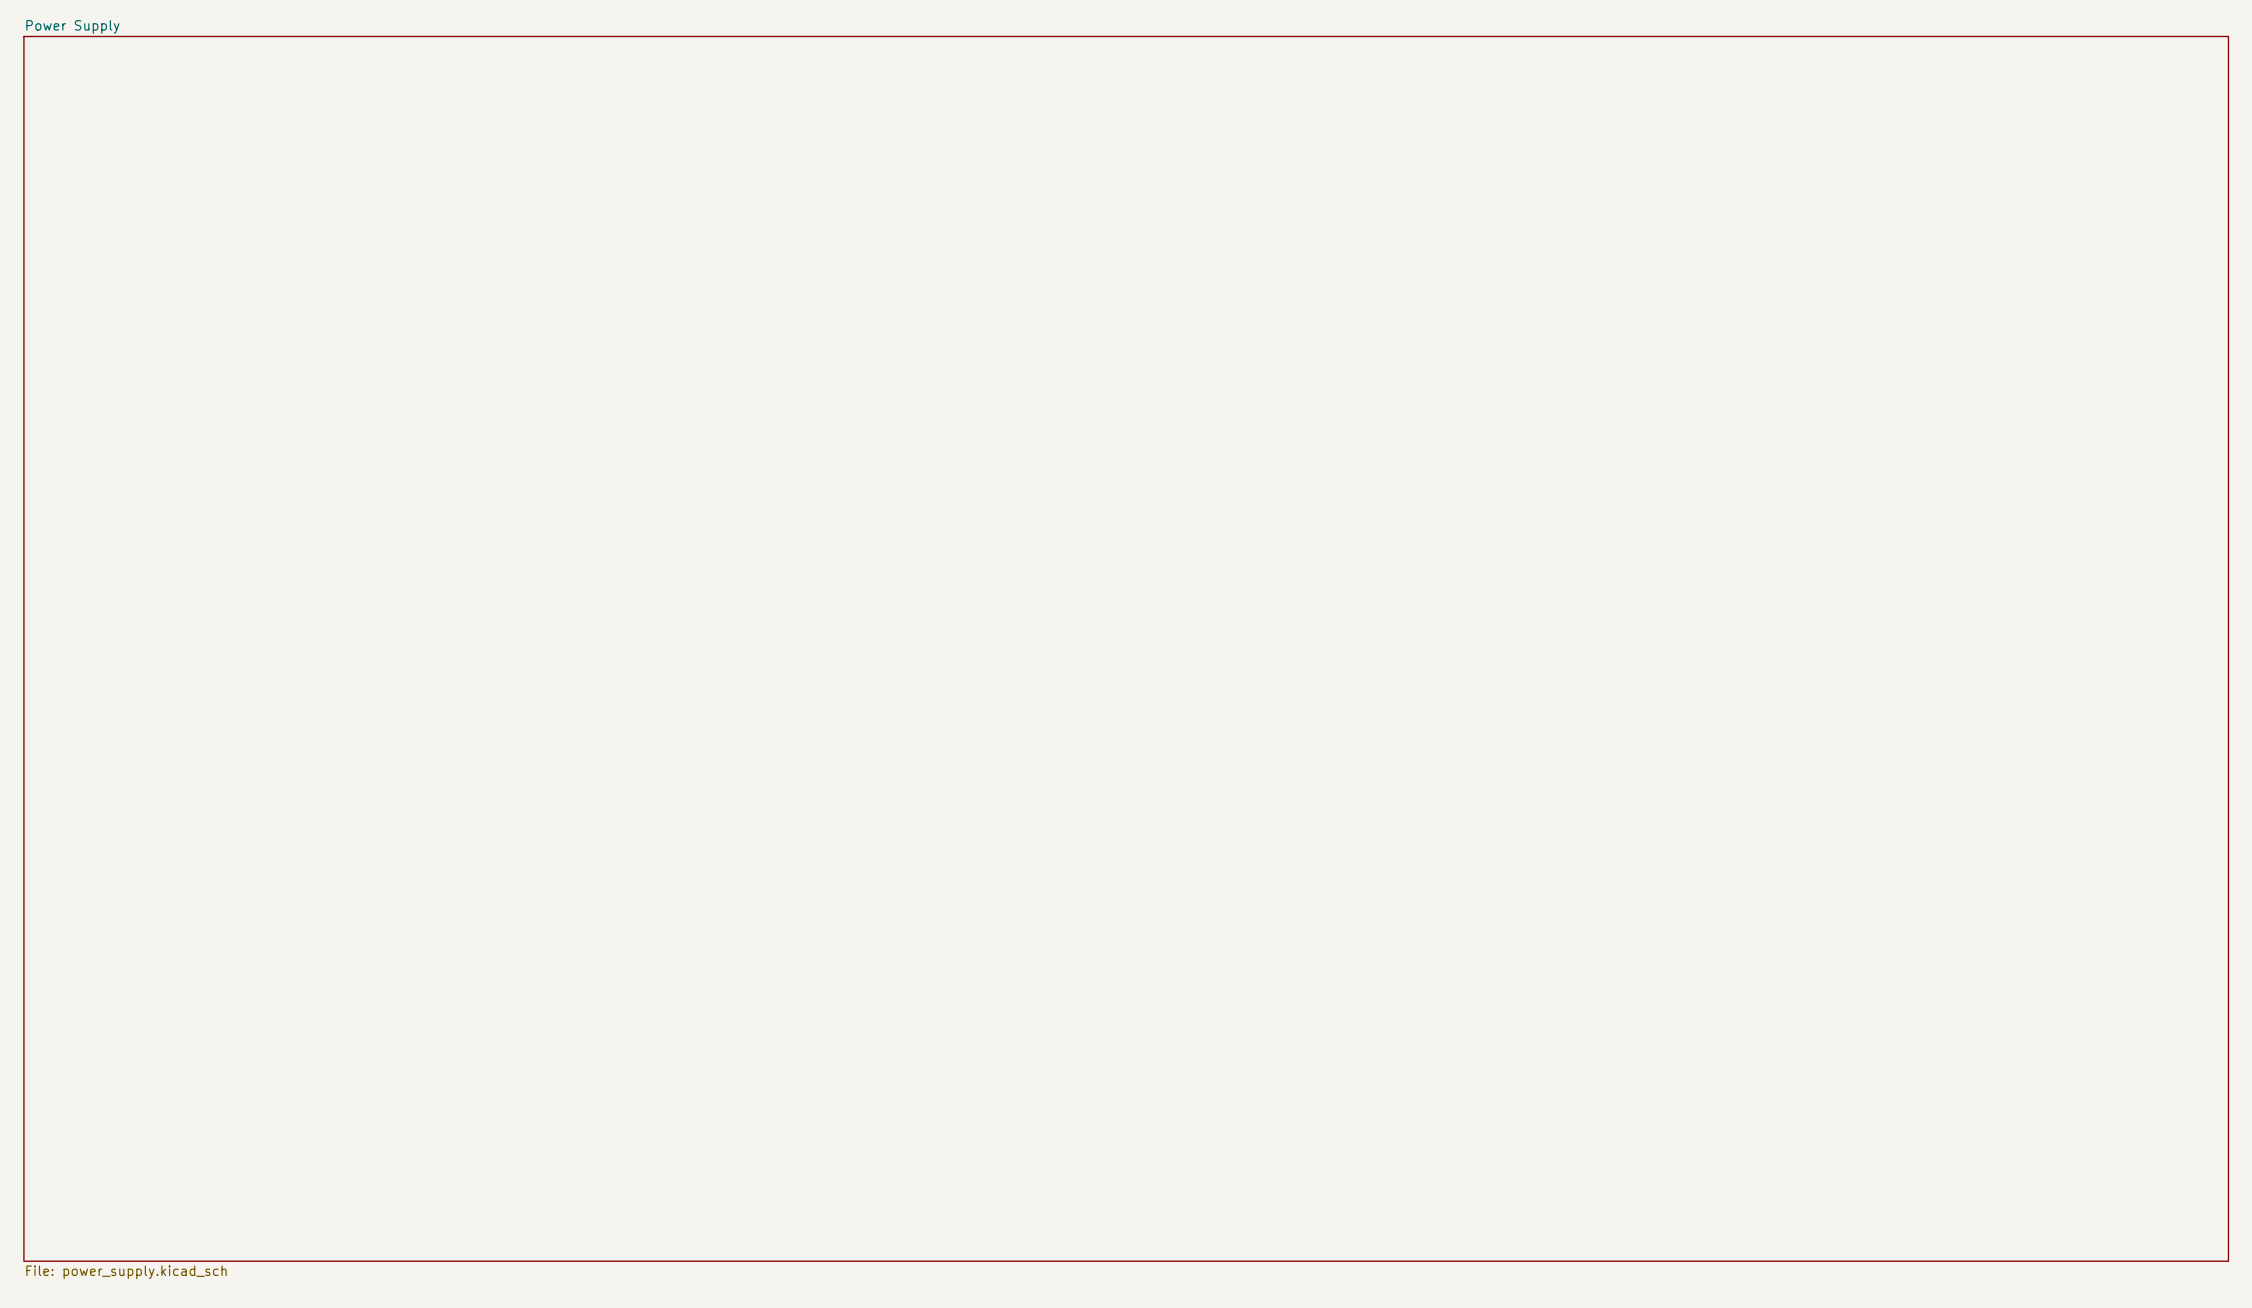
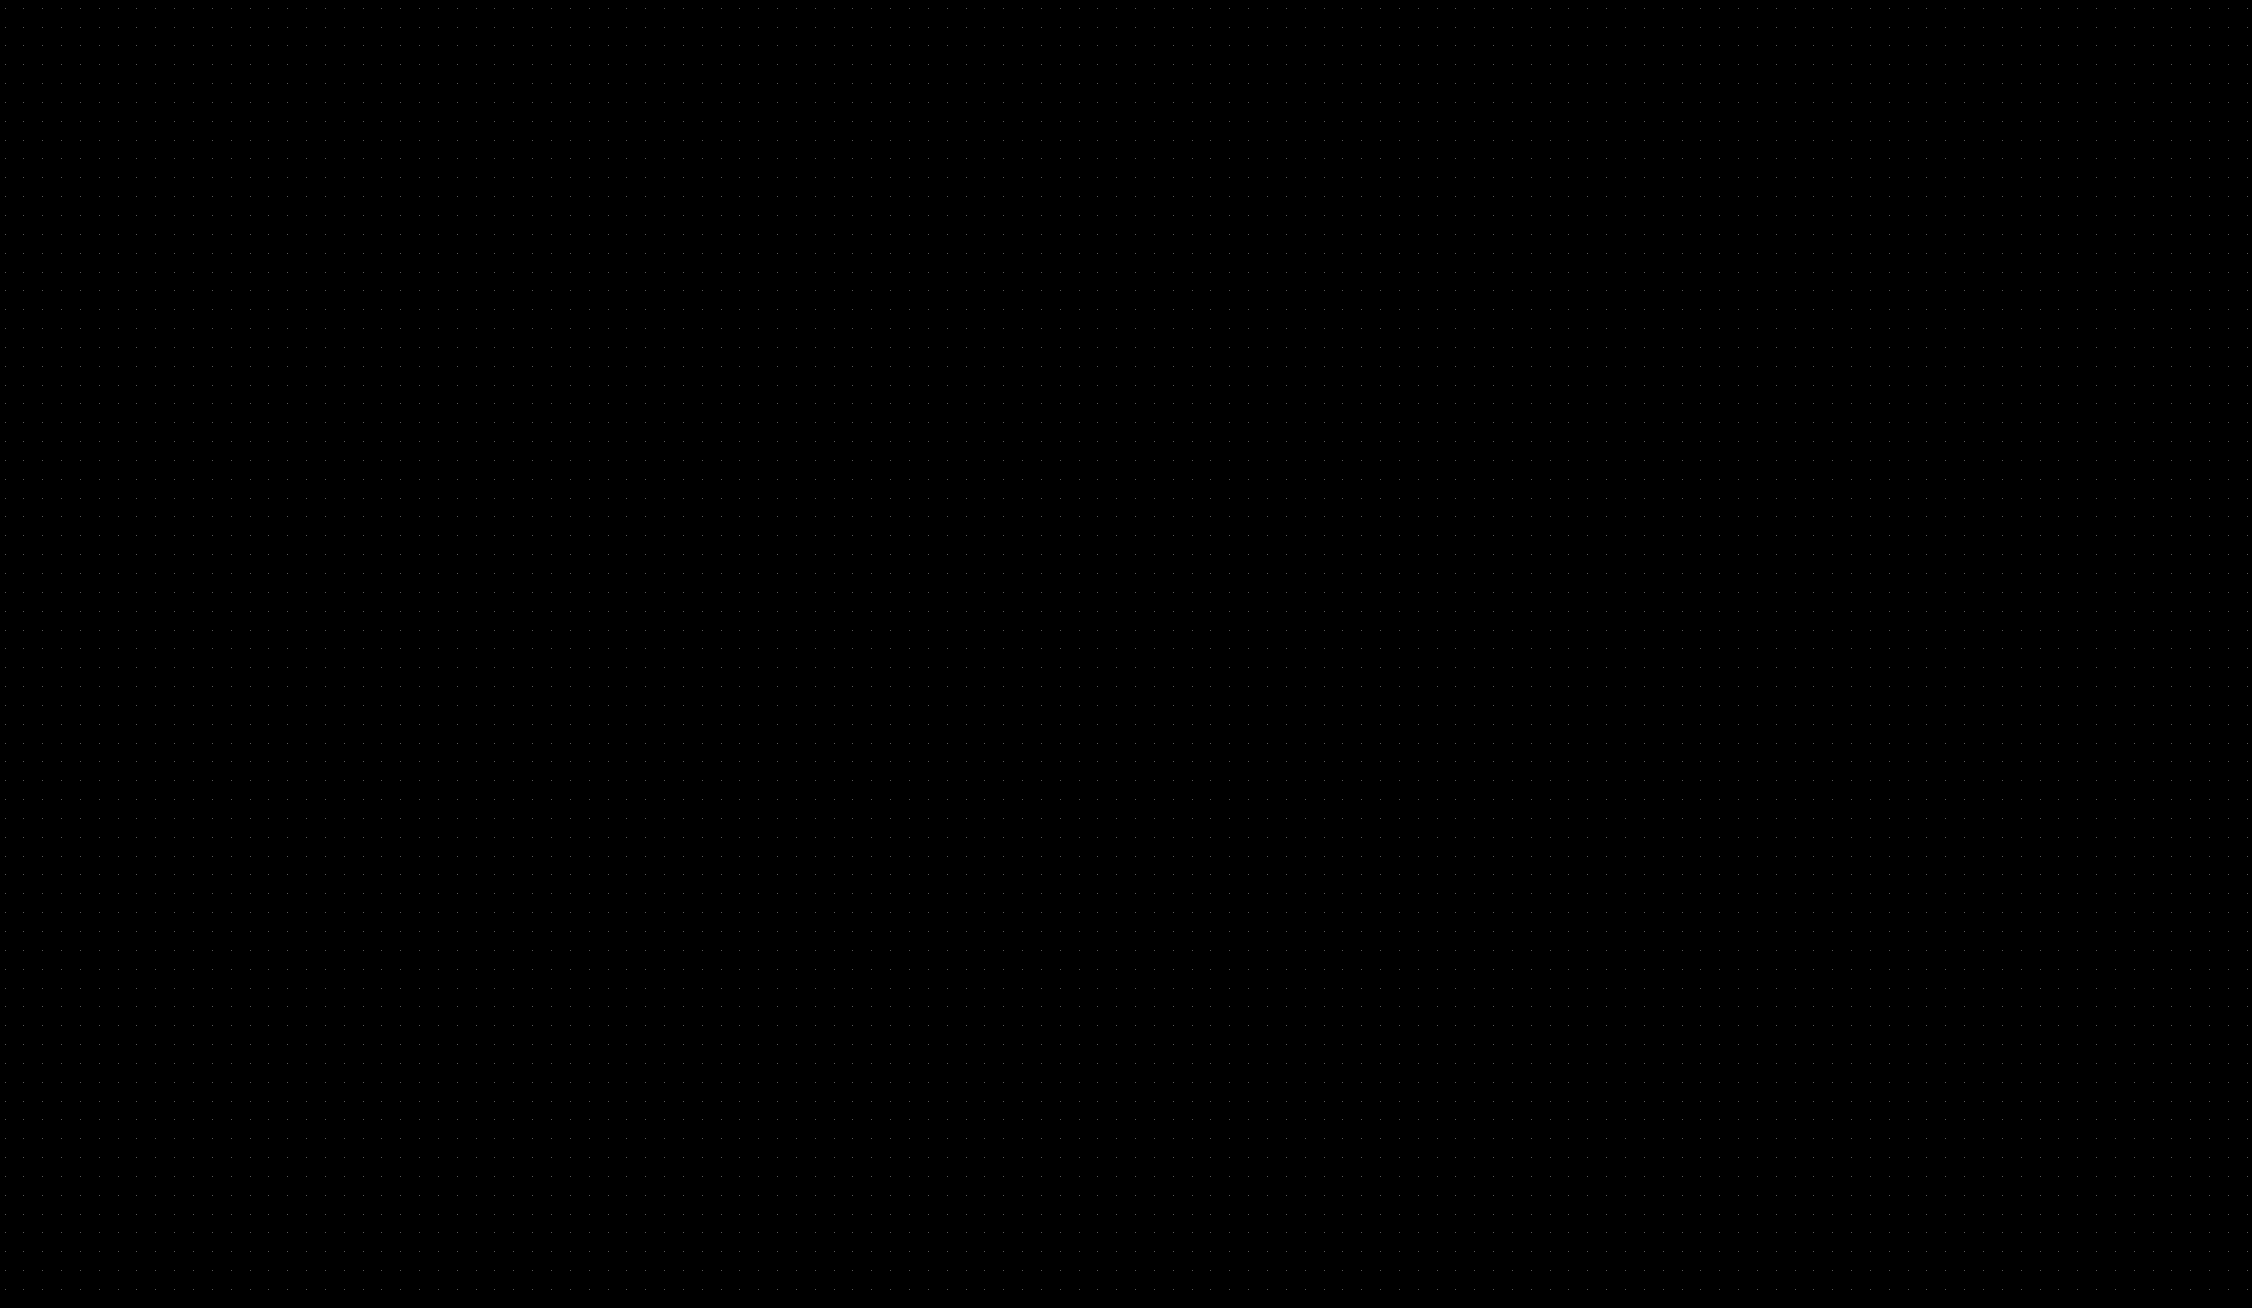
sheet Power Supply: File: power_supply.kicad_sch (1126, 648) -> none

